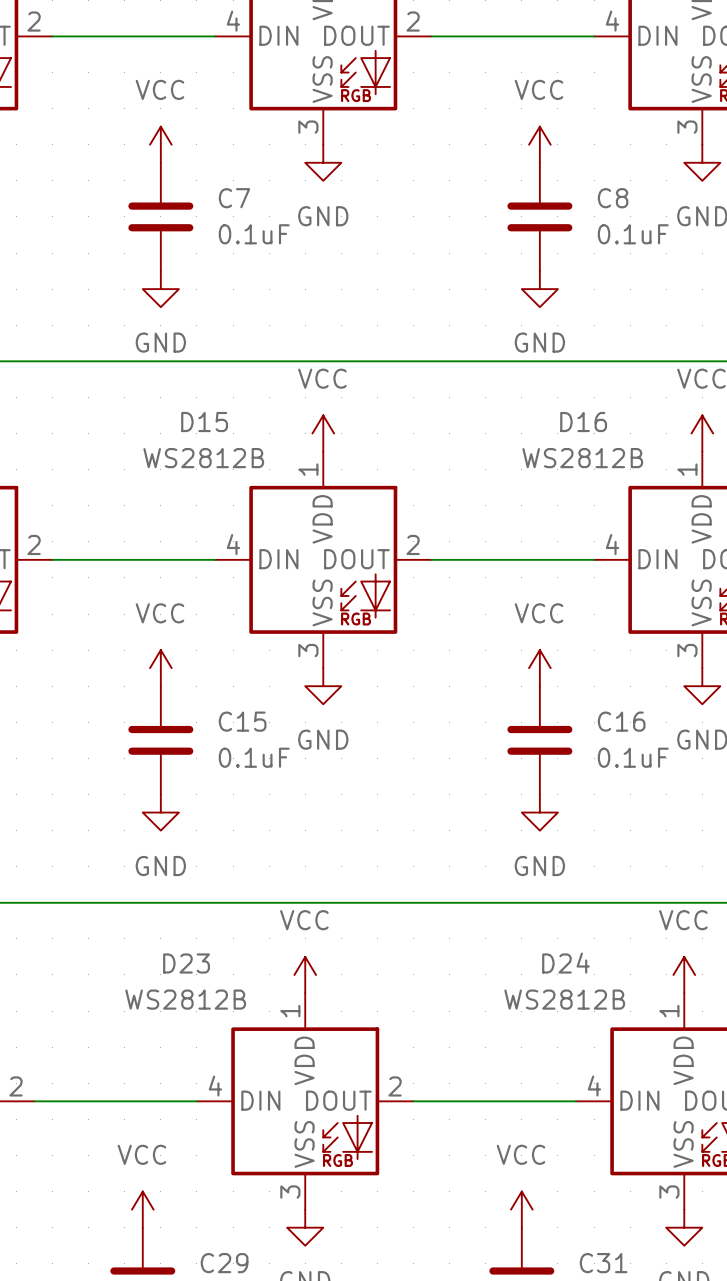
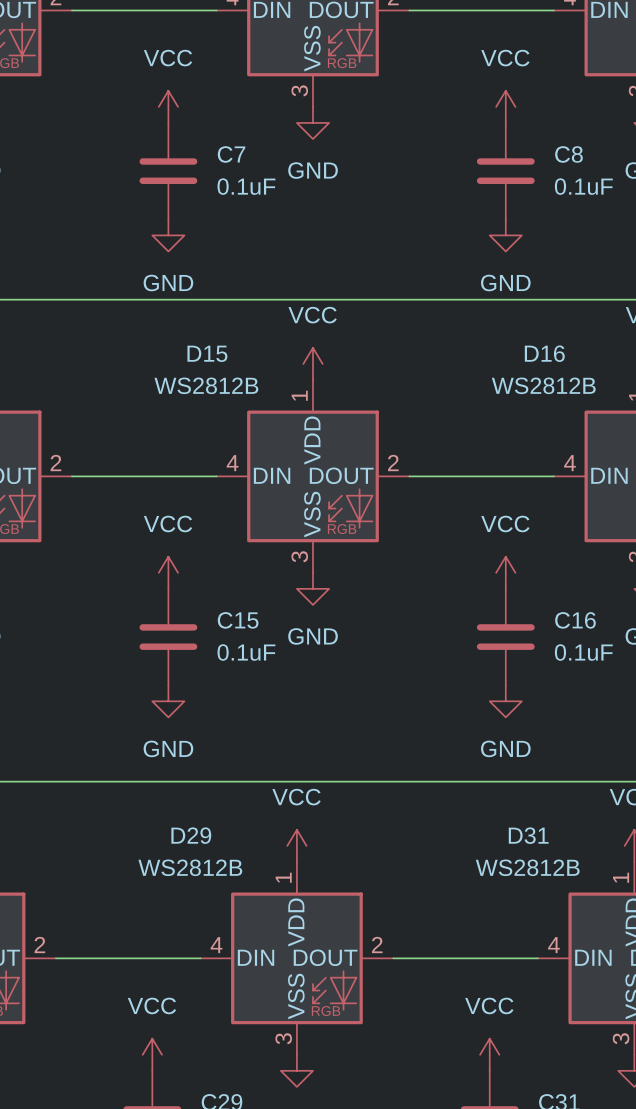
D23 name: D23 (186, 963) -> D29 (191, 835)
D24 name: D24 (566, 963) -> D31 (528, 835)

